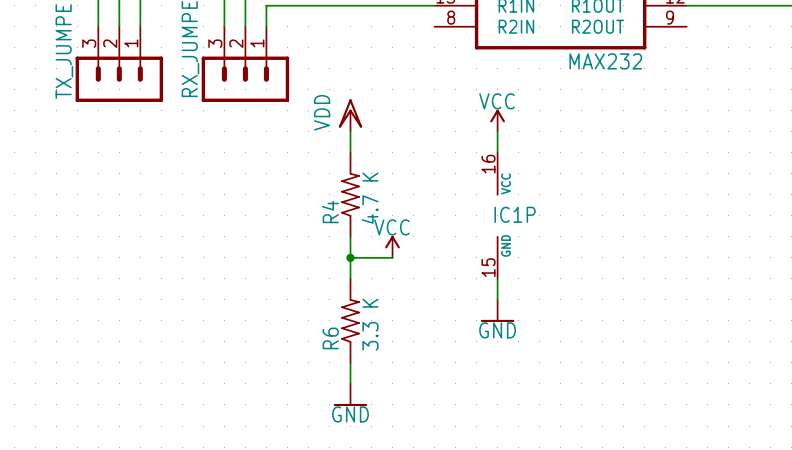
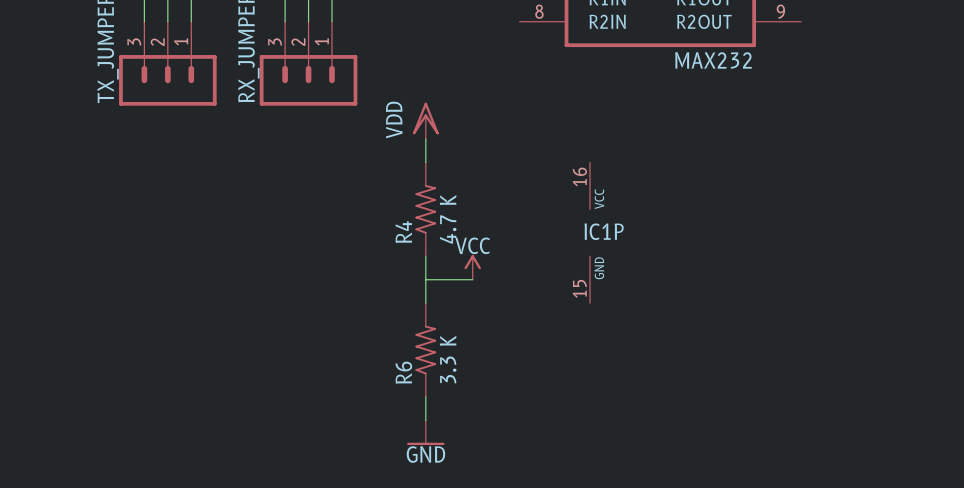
power symbol: VCC (497, 120) -> none
wire: (497, 131) (497, 152) -> none
junction: (350, 257) -> none
wire: (497, 278) (497, 299) -> none
power symbol: GND (497, 310) -> none

